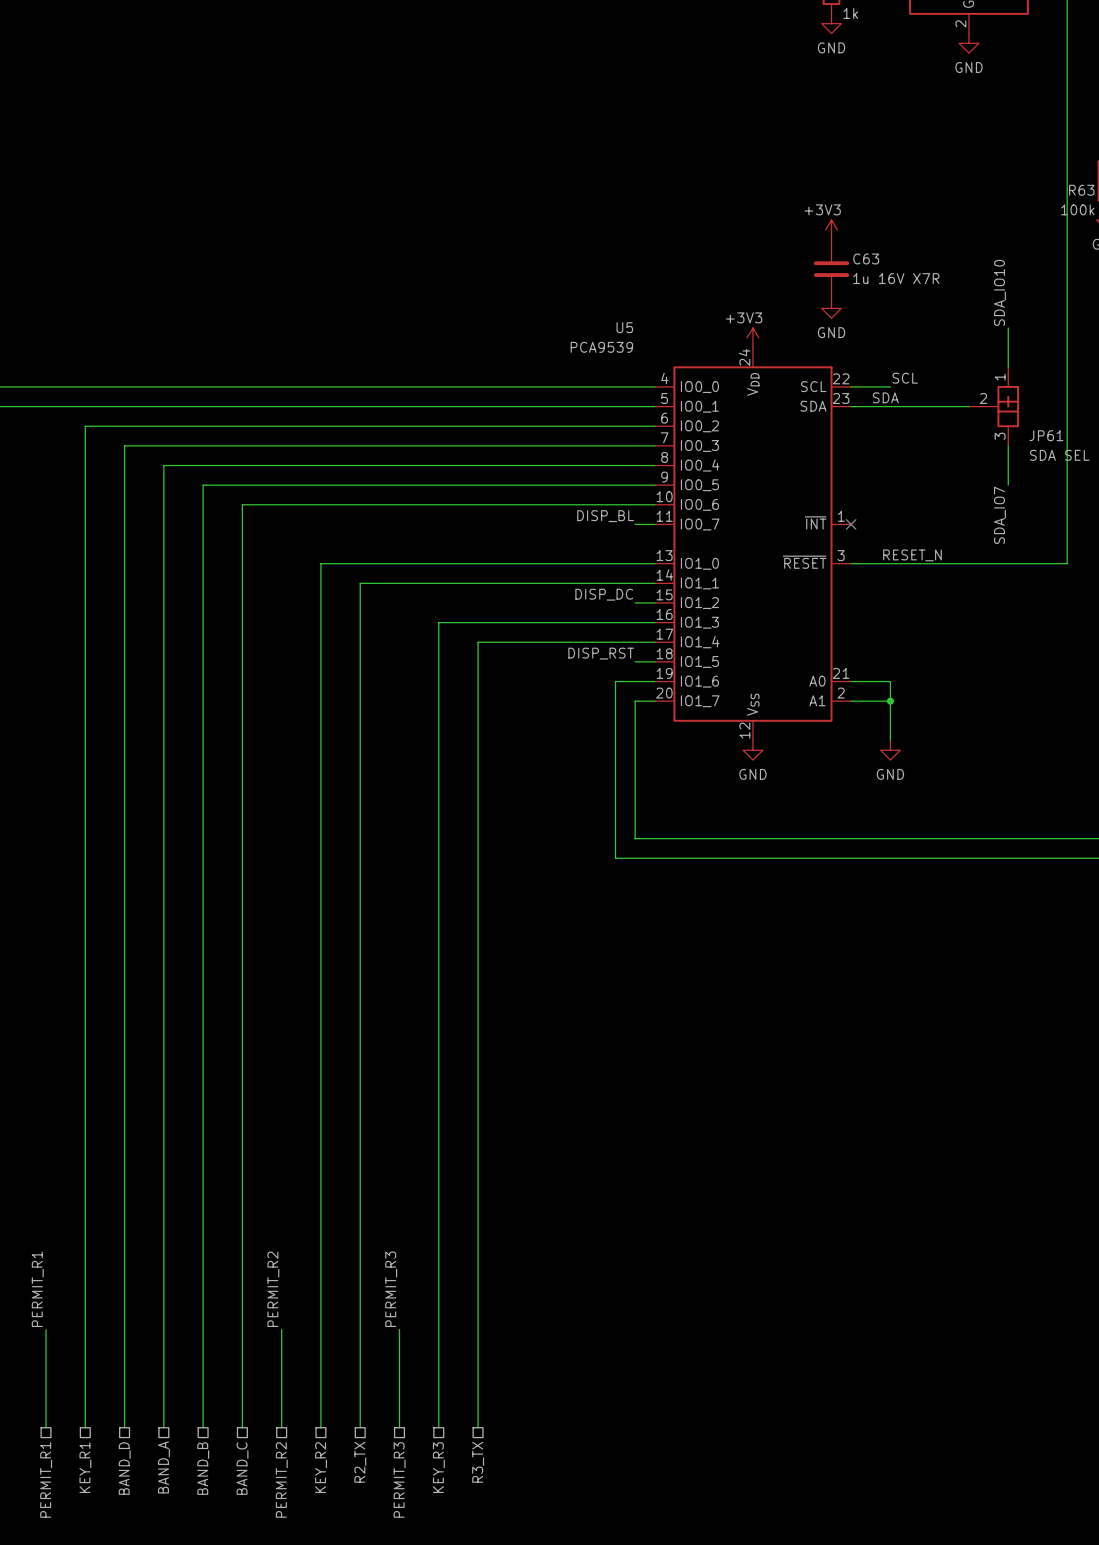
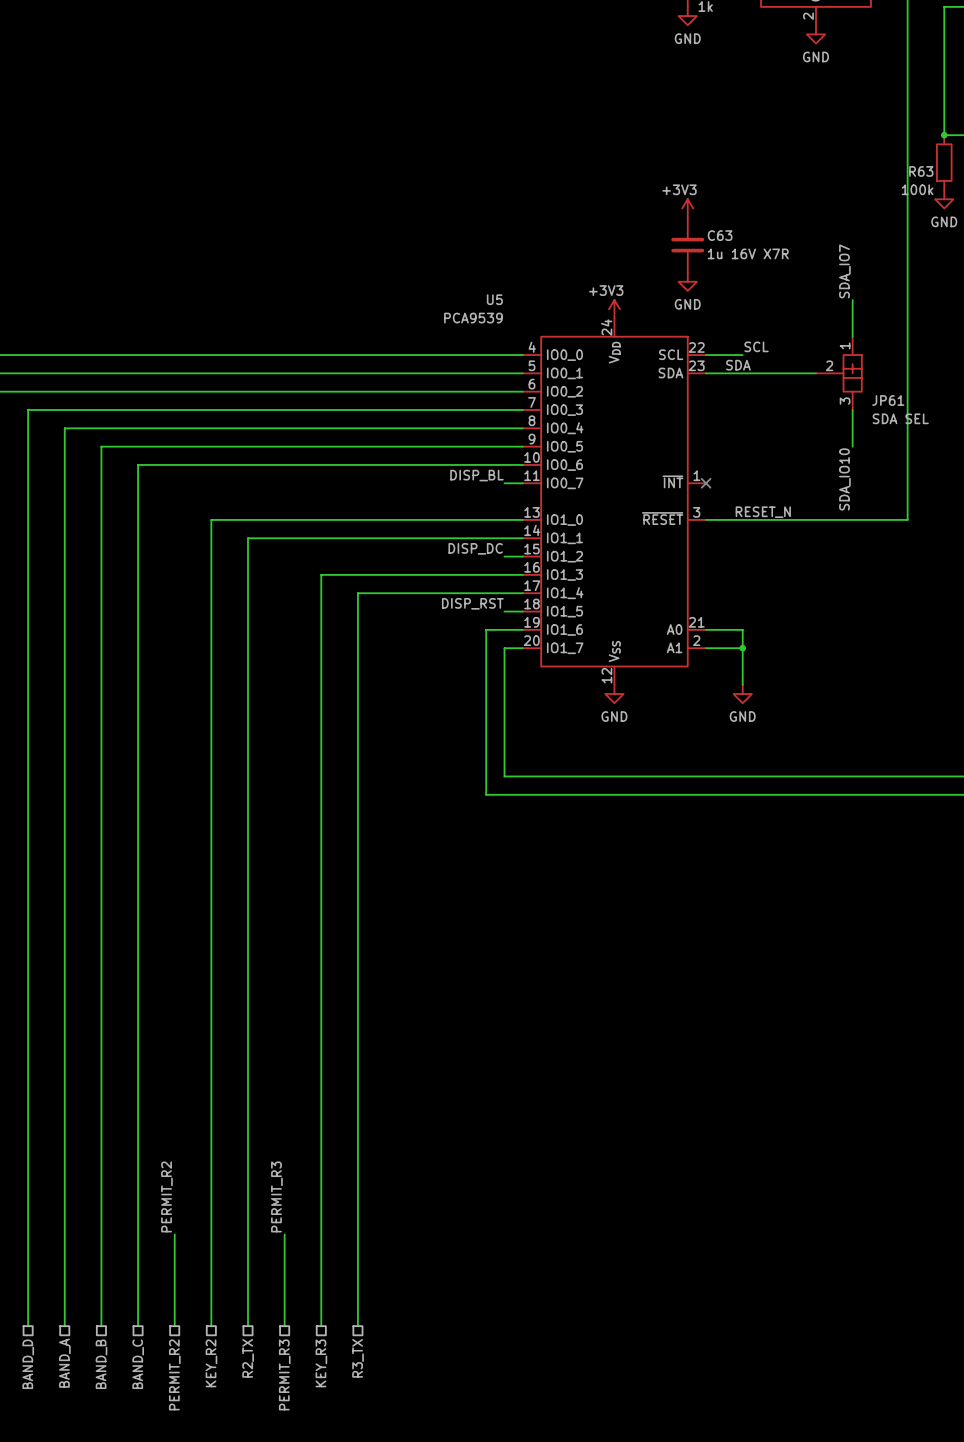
label: SDA_IO10 (999, 292) -> SDA_IO7 (844, 271)
label: SDA_IO7 (999, 515) -> SDA_IO10 (844, 479)

